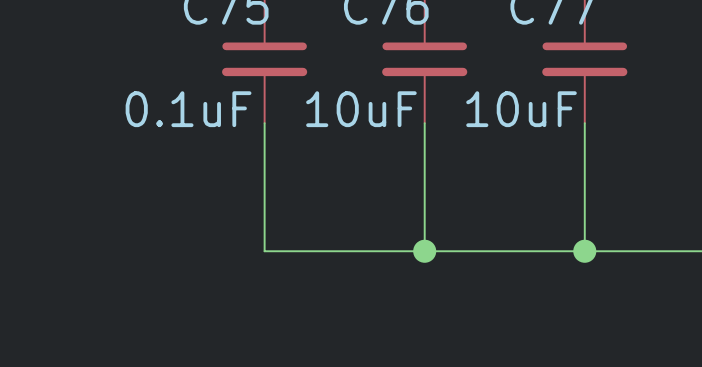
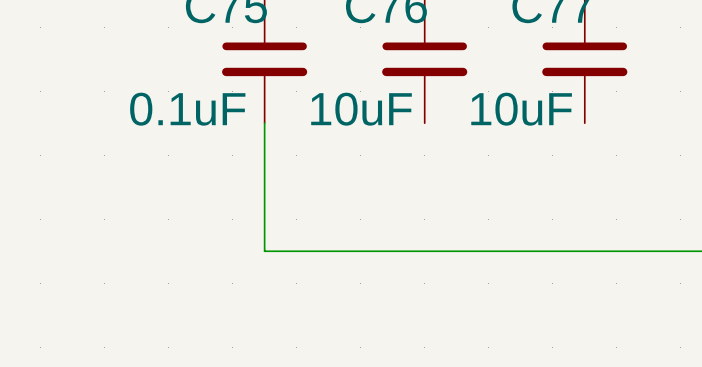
wire: (424, 123) (424, 251) -> none
wire: (584, 123) (584, 251) -> none
junction: (424, 251) -> none
junction: (584, 251) -> none

